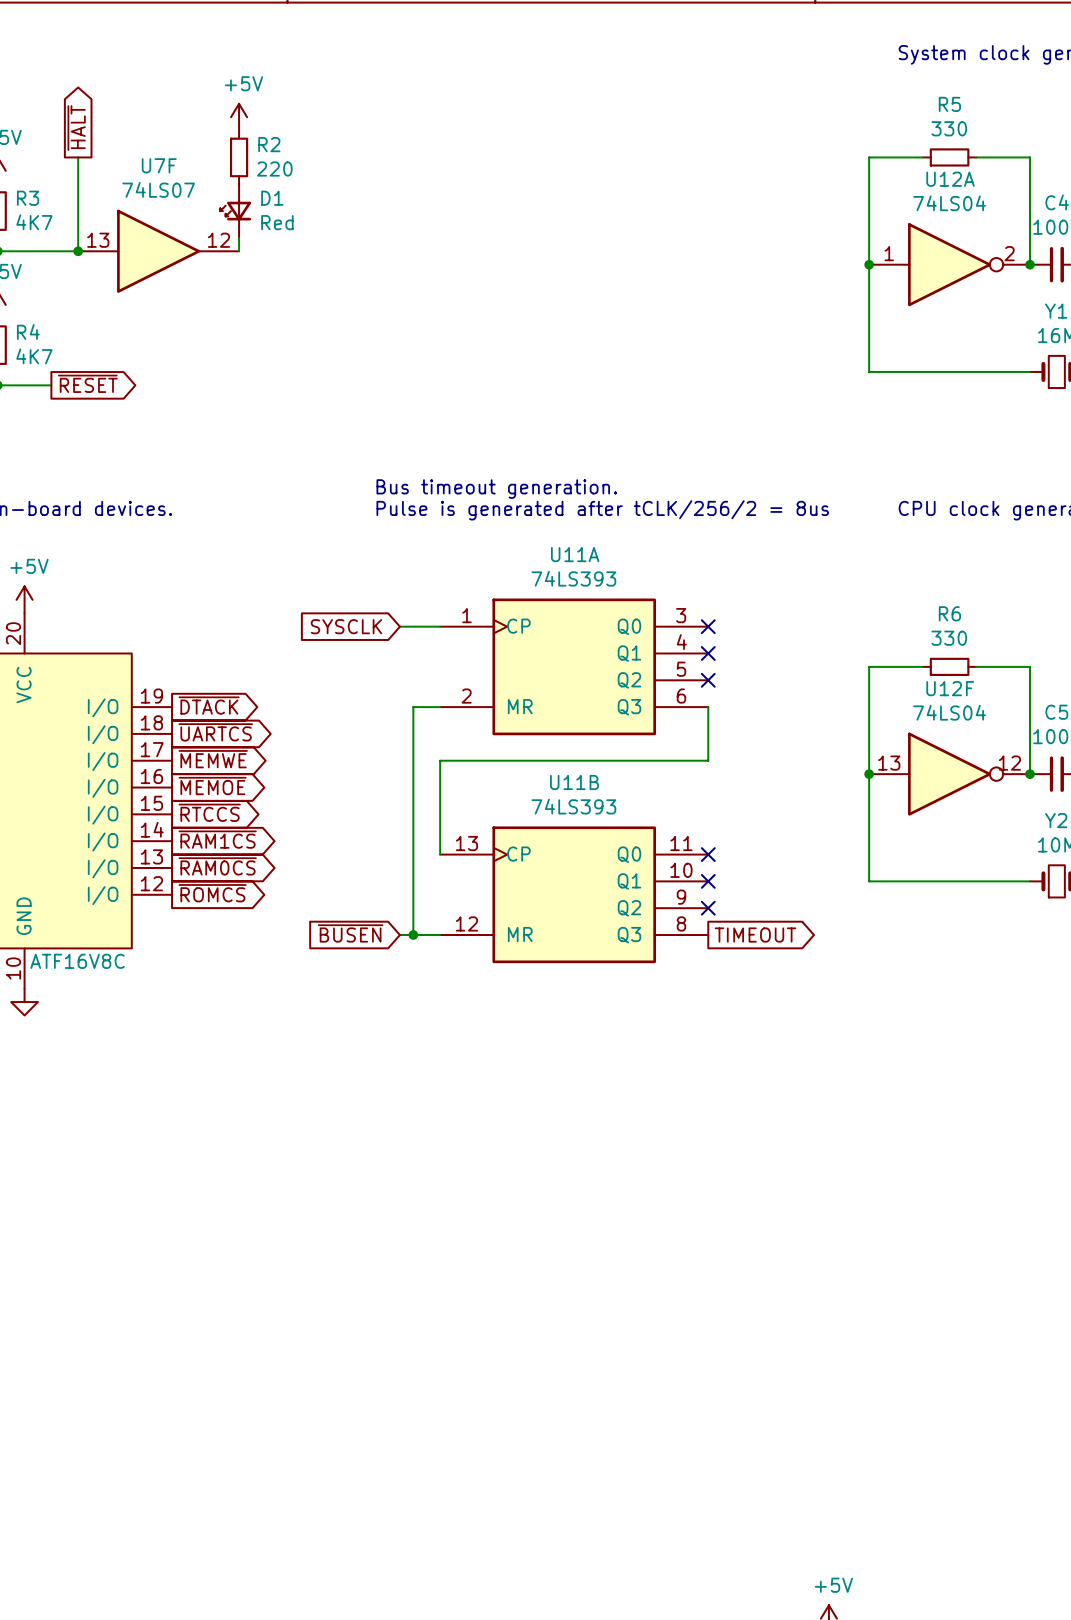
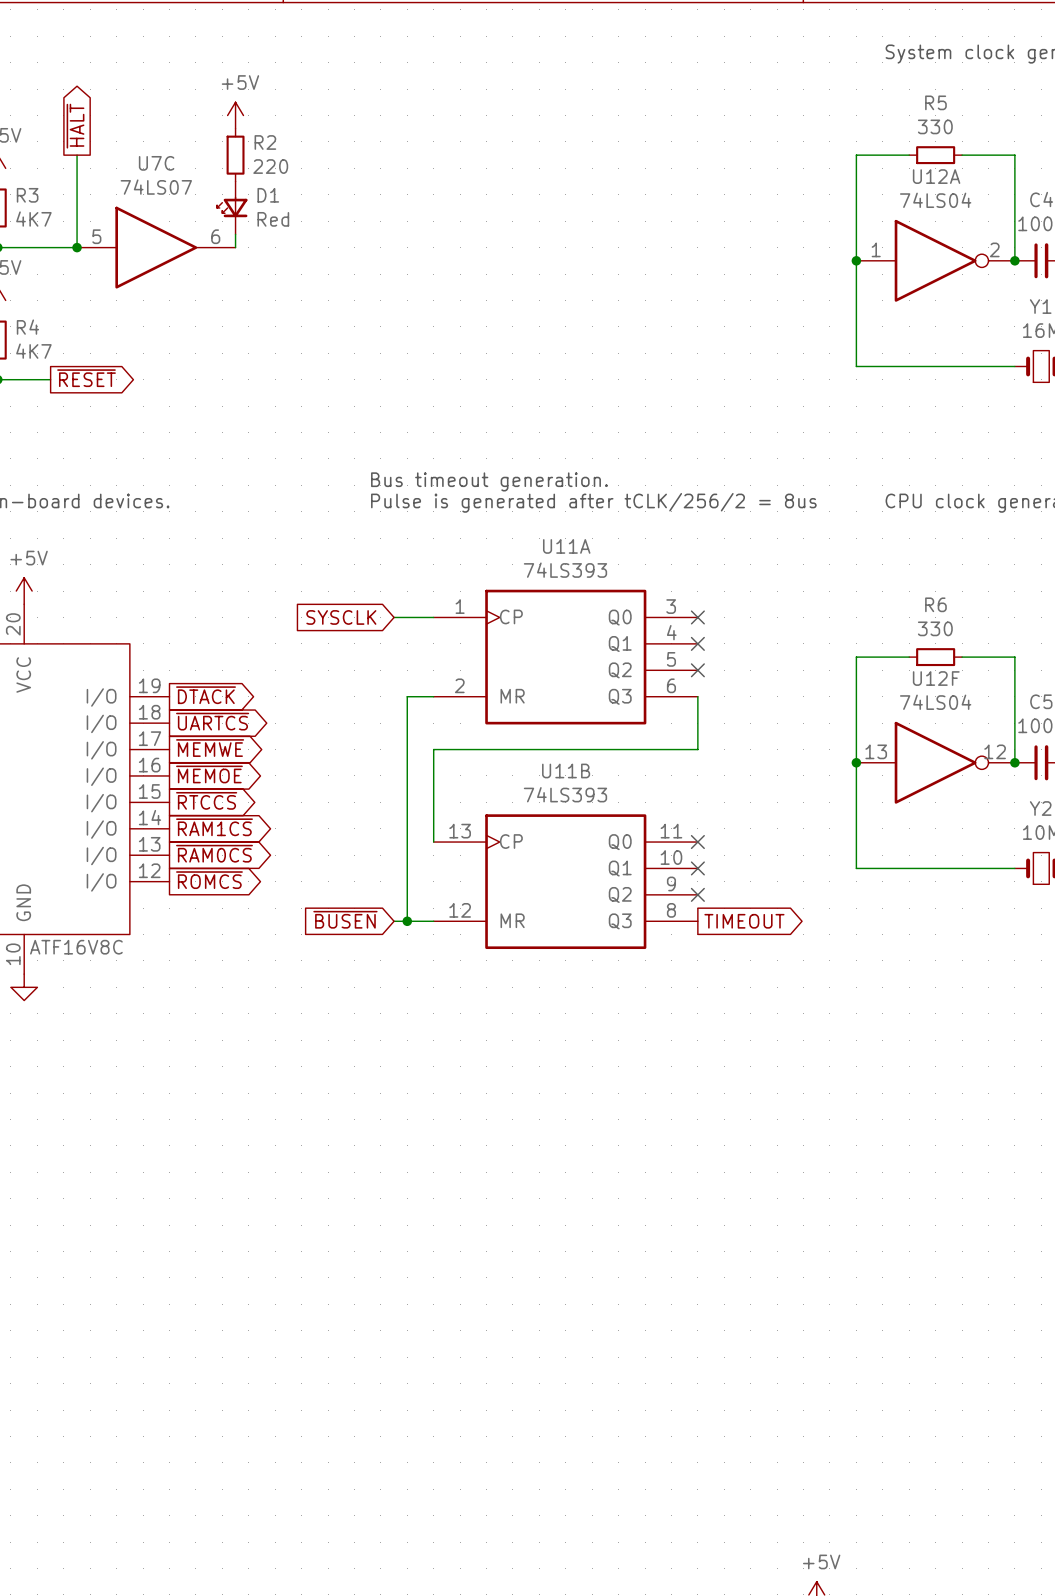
U7F name: U7F (159, 165) -> U7C (156, 163)
U7F pin number: 13 (98, 240) -> 5 (96, 236)
U7F pin number: 12 (218, 240) -> 6 (215, 236)

